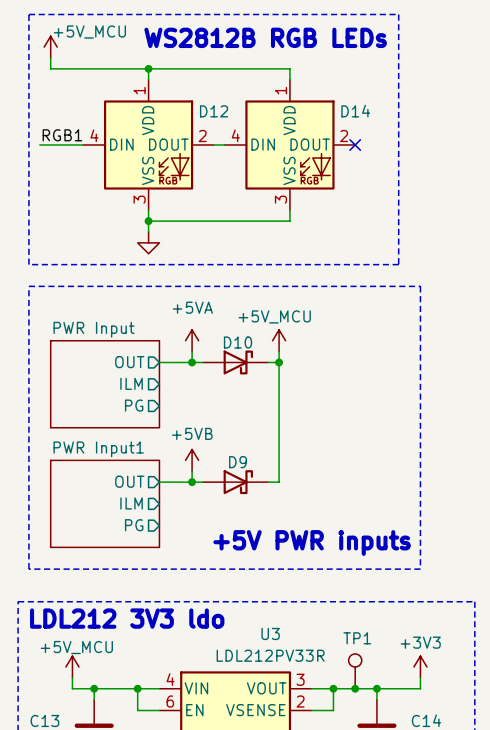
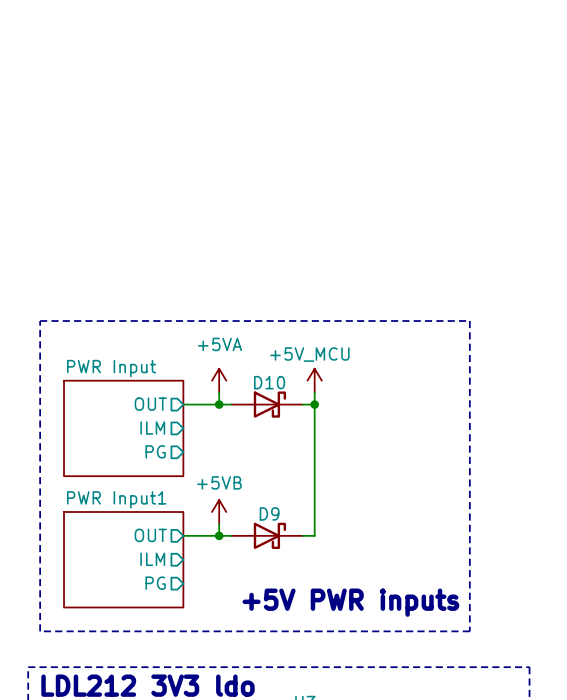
line: (28, 14) (398, 14) (398, 264) (28, 264) (28, 14) -> none
text: WS2812B RGB LEDs (265, 37) -> none
power symbol: +5V_MCU (50, 47) -> none
wire: (50, 57) (50, 68) (289, 68) (289, 79) -> none
wire: (148, 68) (148, 79) -> none
junction: (148, 68) -> none
label: RGB1 (62, 135) -> none
wire: (39, 145) (83, 145) -> none
D12: (148, 145) -> none
wire: (213, 145) (224, 145) -> none
D14: (289, 145) -> none
no-connect mark: (355, 145) -> none
wire: (148, 210) (148, 232) -> none
wire: (289, 210) (289, 221) (148, 221) -> none
junction: (148, 221) -> none
power symbol: (148, 242) -> none

